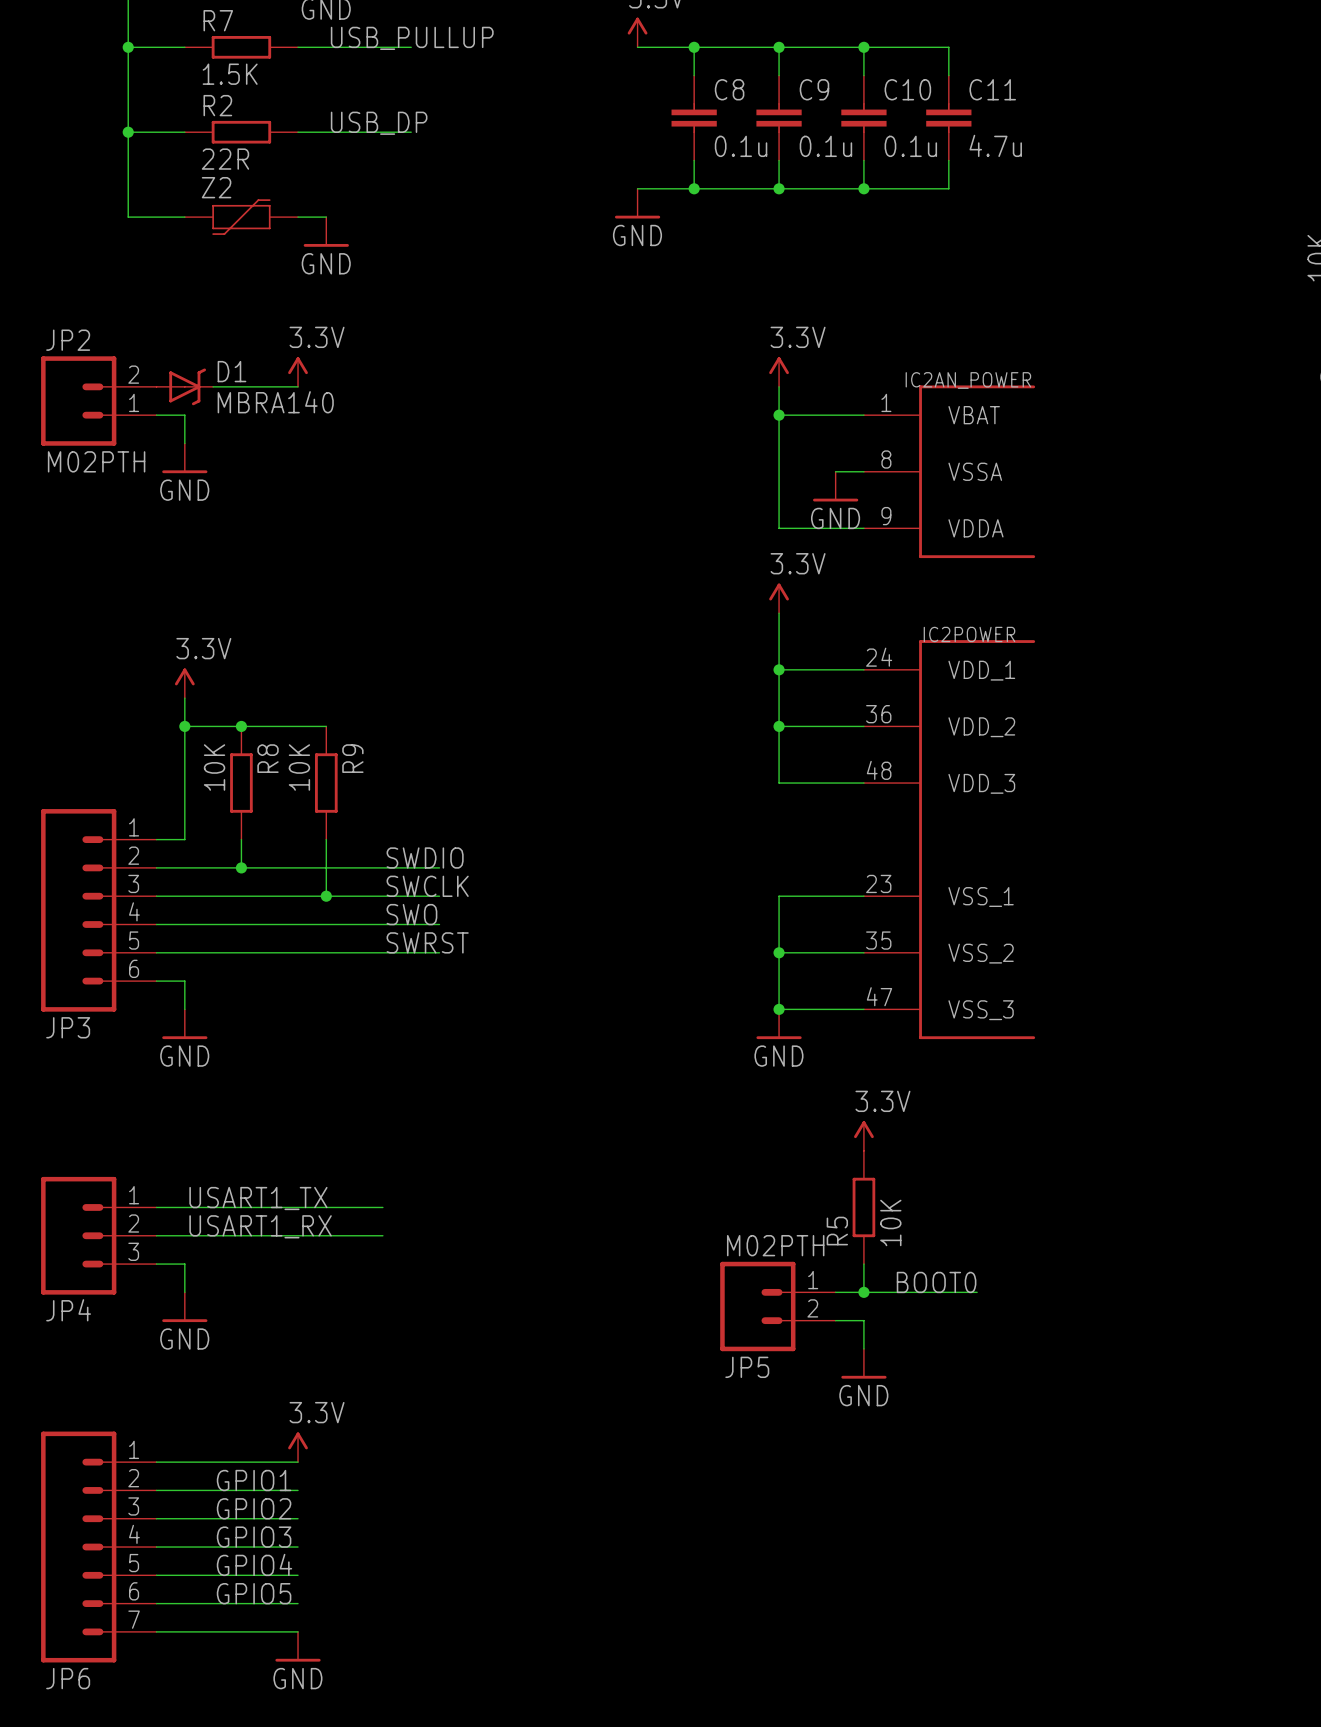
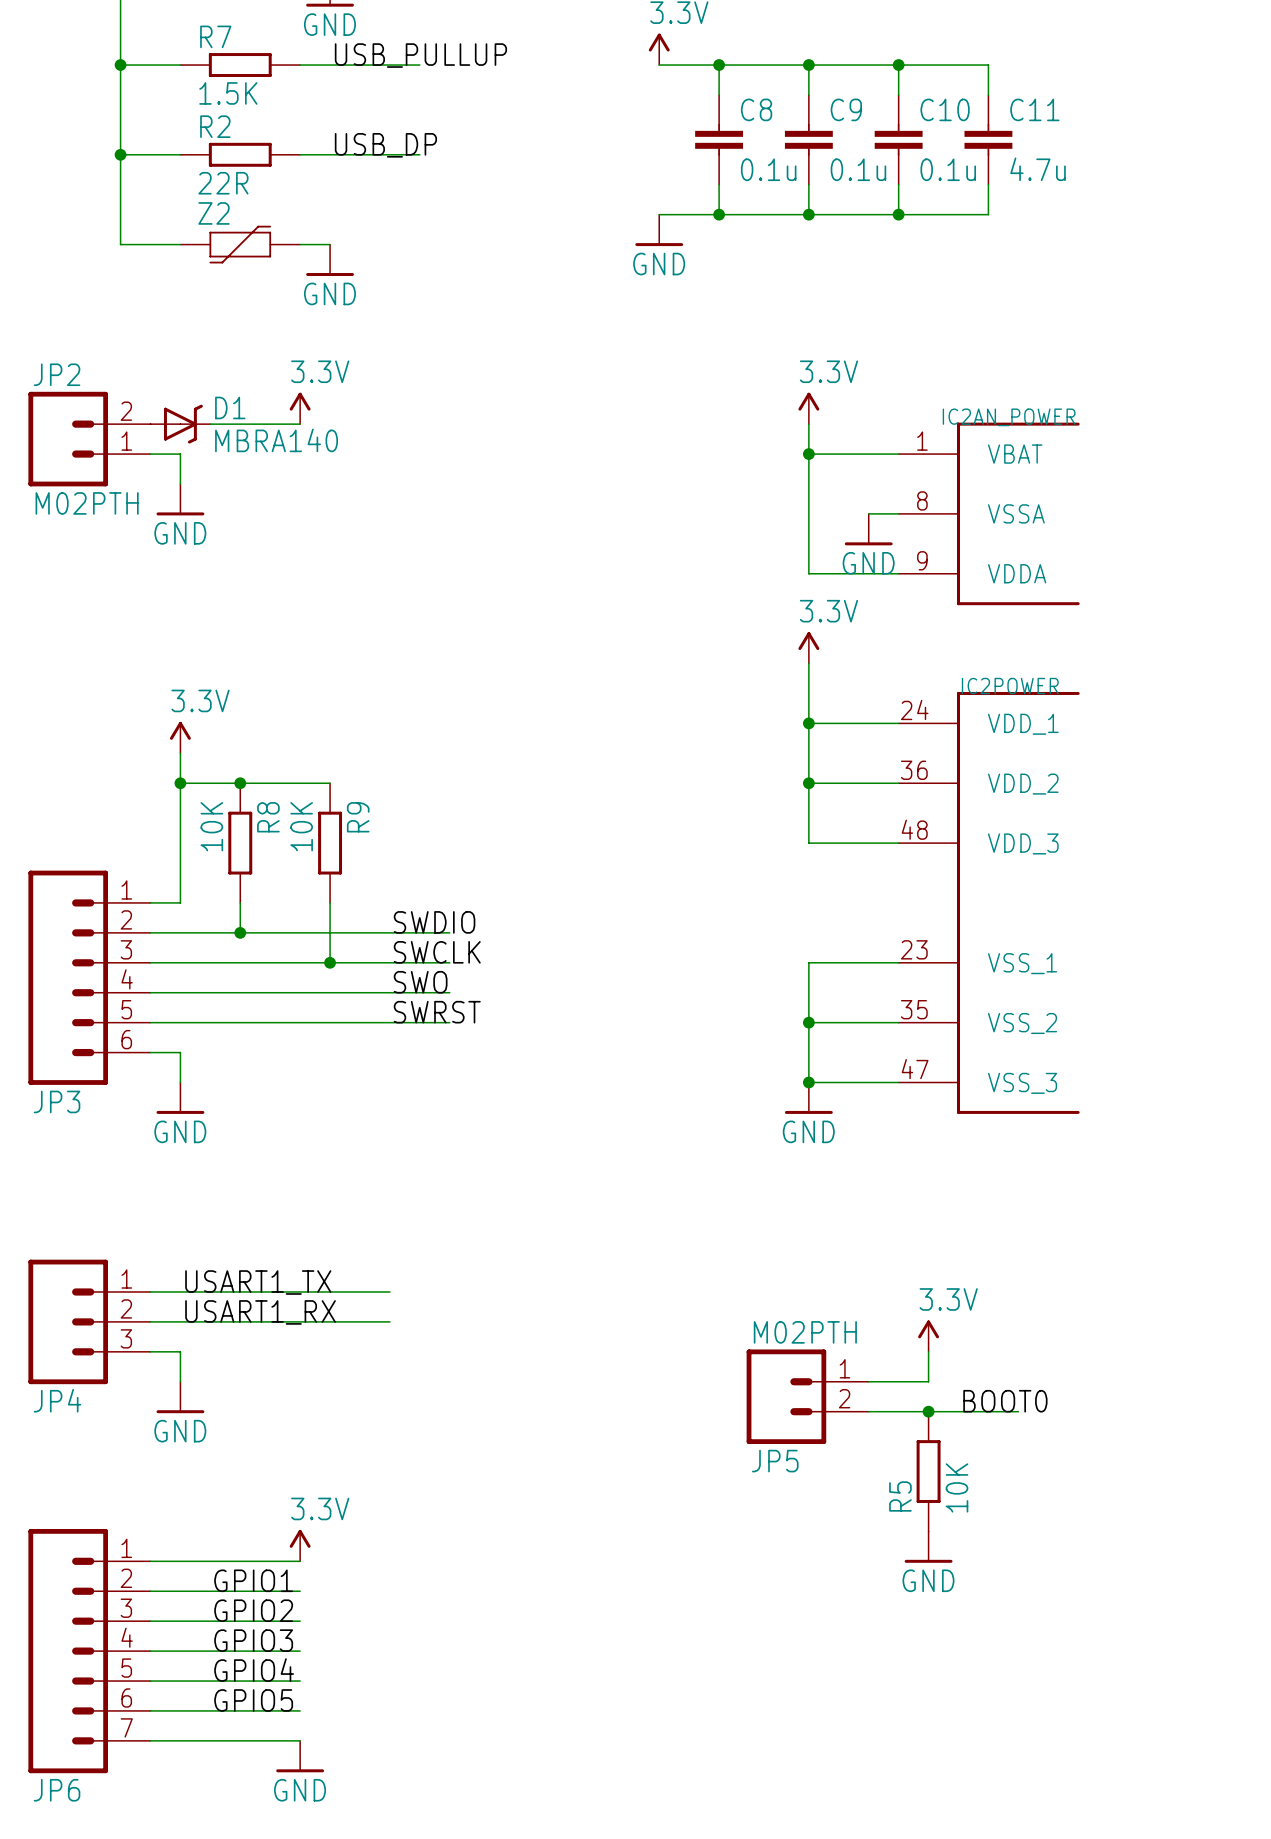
power symbol position: 3.3V (863, 1136) -> 3.3V (928, 1336)
R5 position: (863, 1207) -> (928, 1471)
wire: (863, 1264) (863, 1292) -> none
label position: BOOT0 (936, 1282) -> BOOT0 (1005, 1401)
junction position: (863, 1292) -> (928, 1411)
wire: (892, 1292) (977, 1292) -> (928, 1381) (928, 1351)
wire: (863, 1320) (863, 1348) -> (898, 1411) (1018, 1411)
power symbol position: GND (863, 1363) -> GND (928, 1547)

